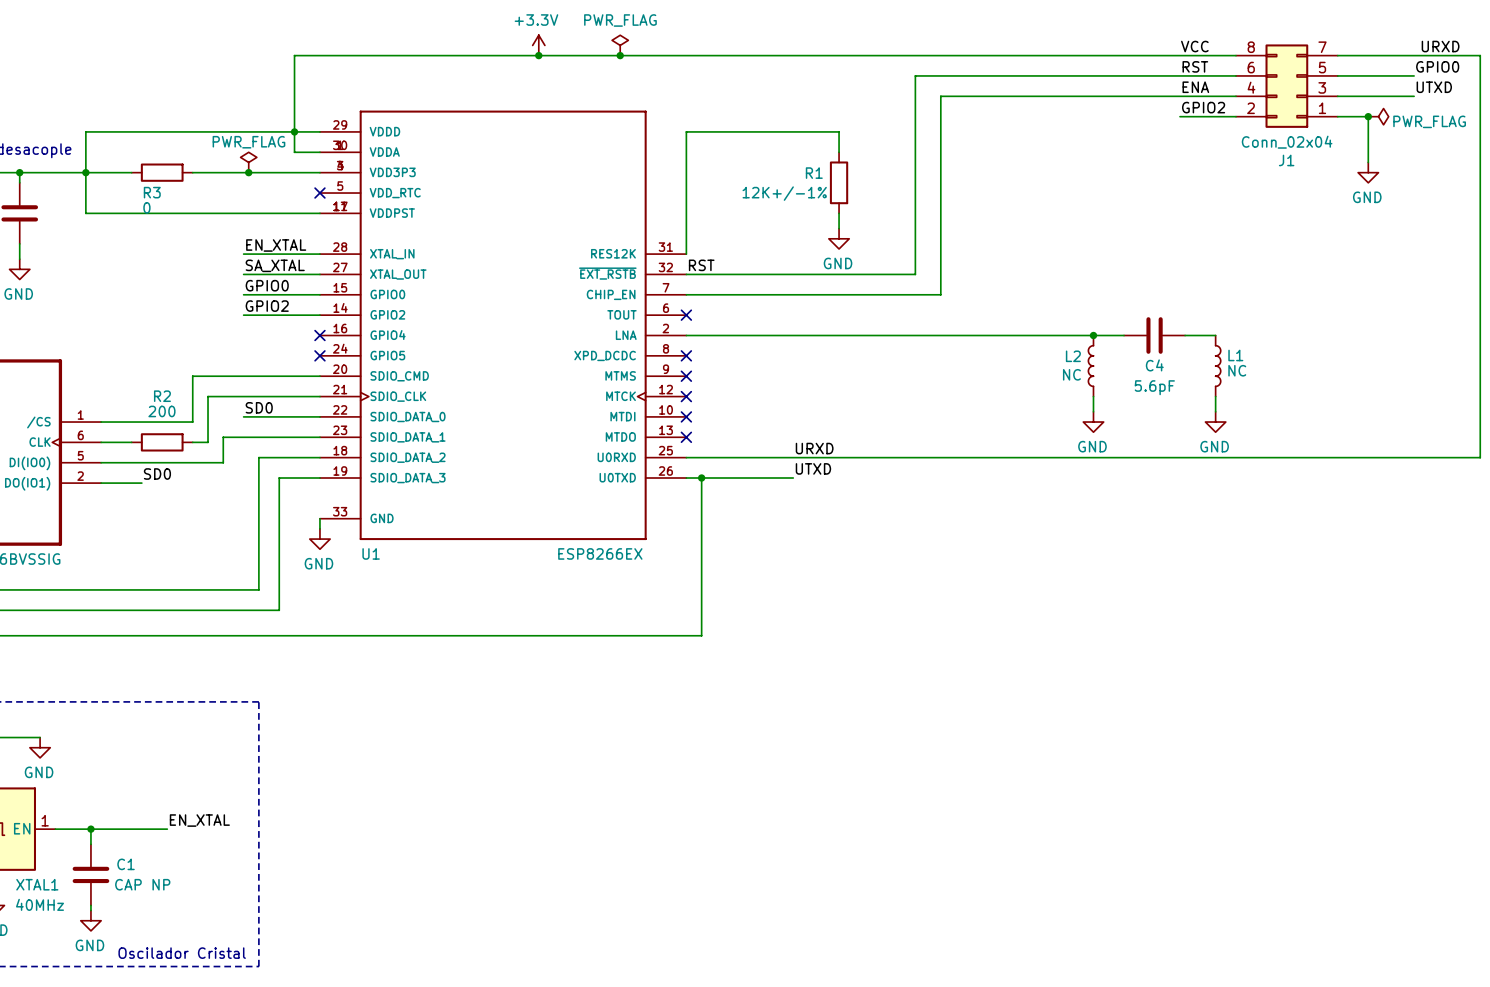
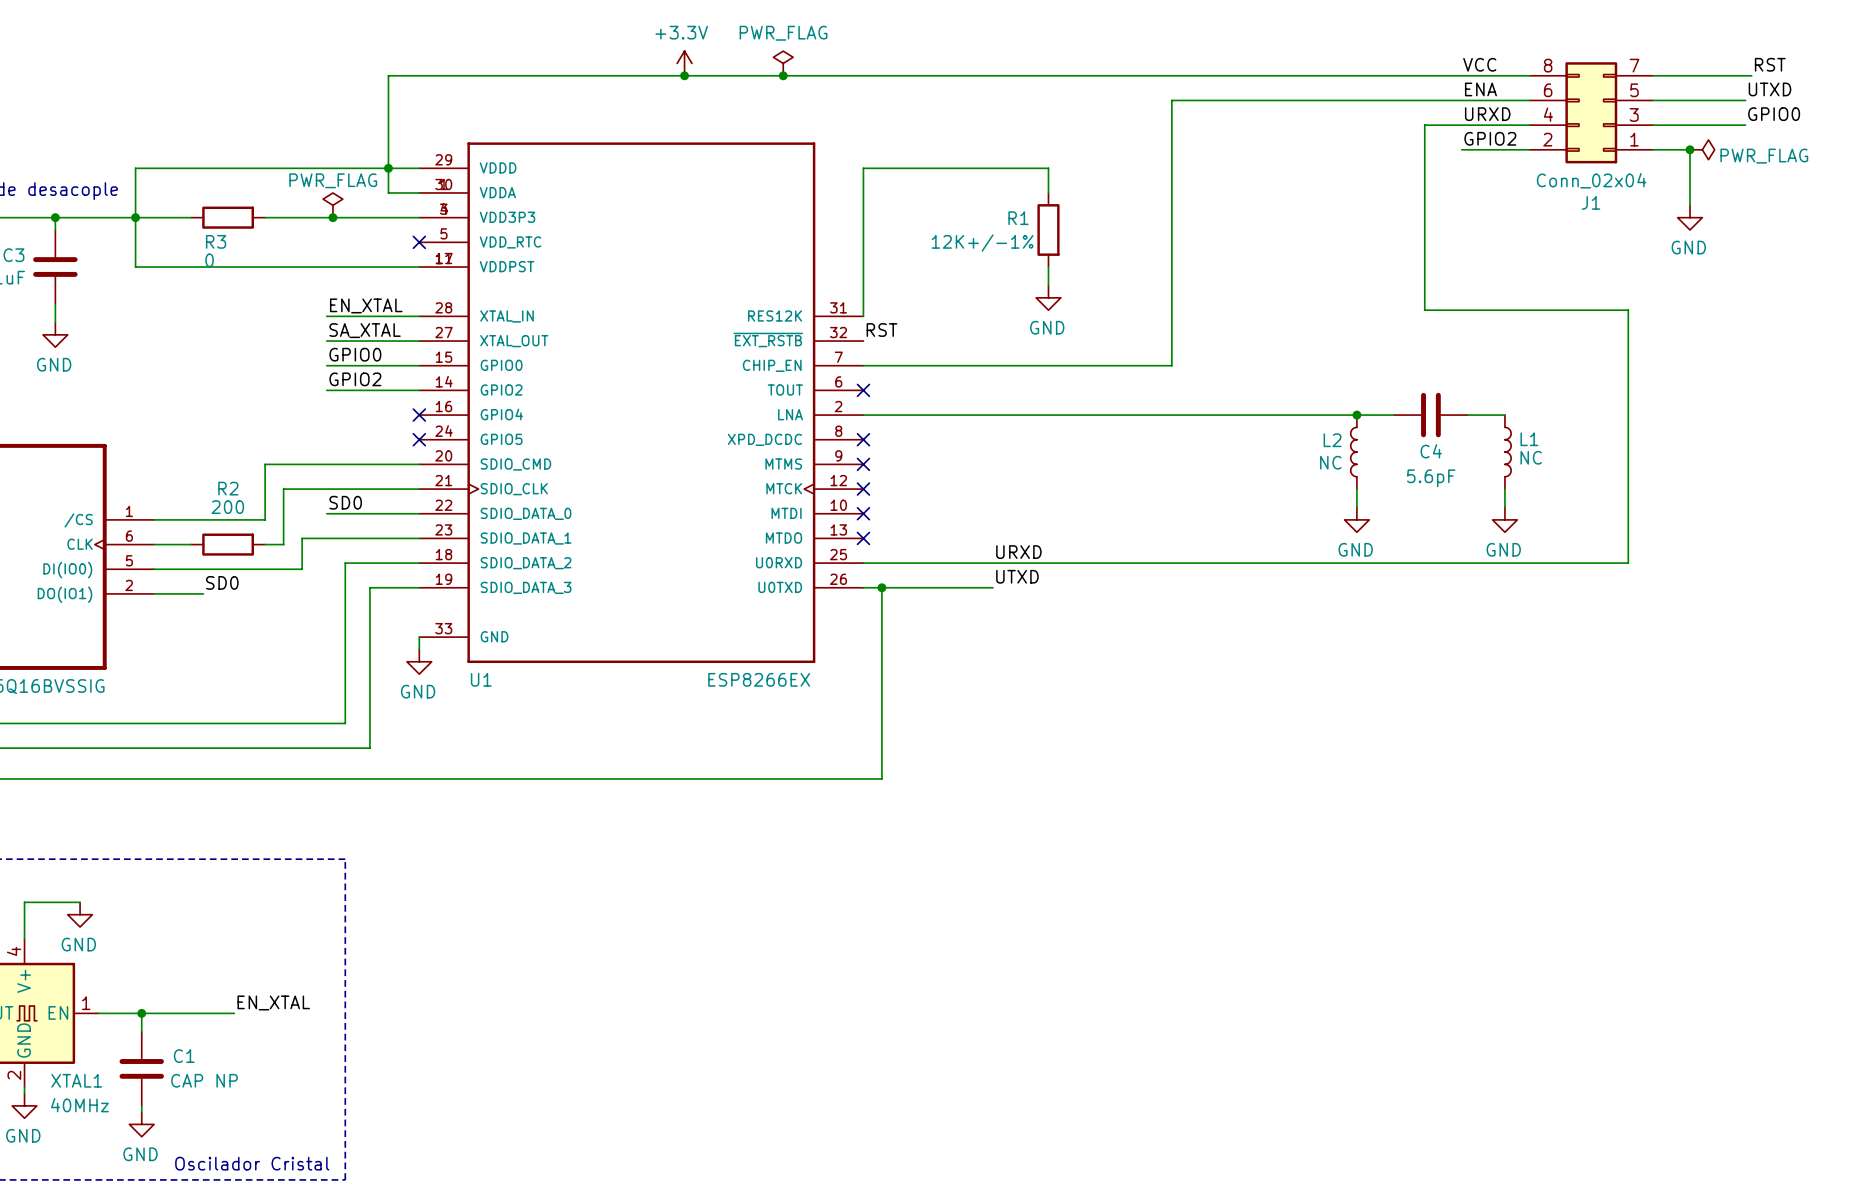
label: URXD (1440, 46) -> RST (1770, 64)
wire: (1419, 55) (1480, 55) (1480, 457) (1317, 457) -> (1424, 125) (1424, 310) (1628, 310) (1628, 563)
label: RST (1195, 66) -> ENA (1480, 89)
label: GPIO0 (1437, 66) -> UTXD (1769, 89)
wire: (940, 75) (915, 75) (915, 274) (686, 274) -> none
label: ENA (1195, 87) -> URXD (1487, 114)
label: UTXD (1434, 87) -> GPIO0 (1774, 114)
wire: (940, 96) (1149, 96) -> (1171, 125) (1171, 100)

